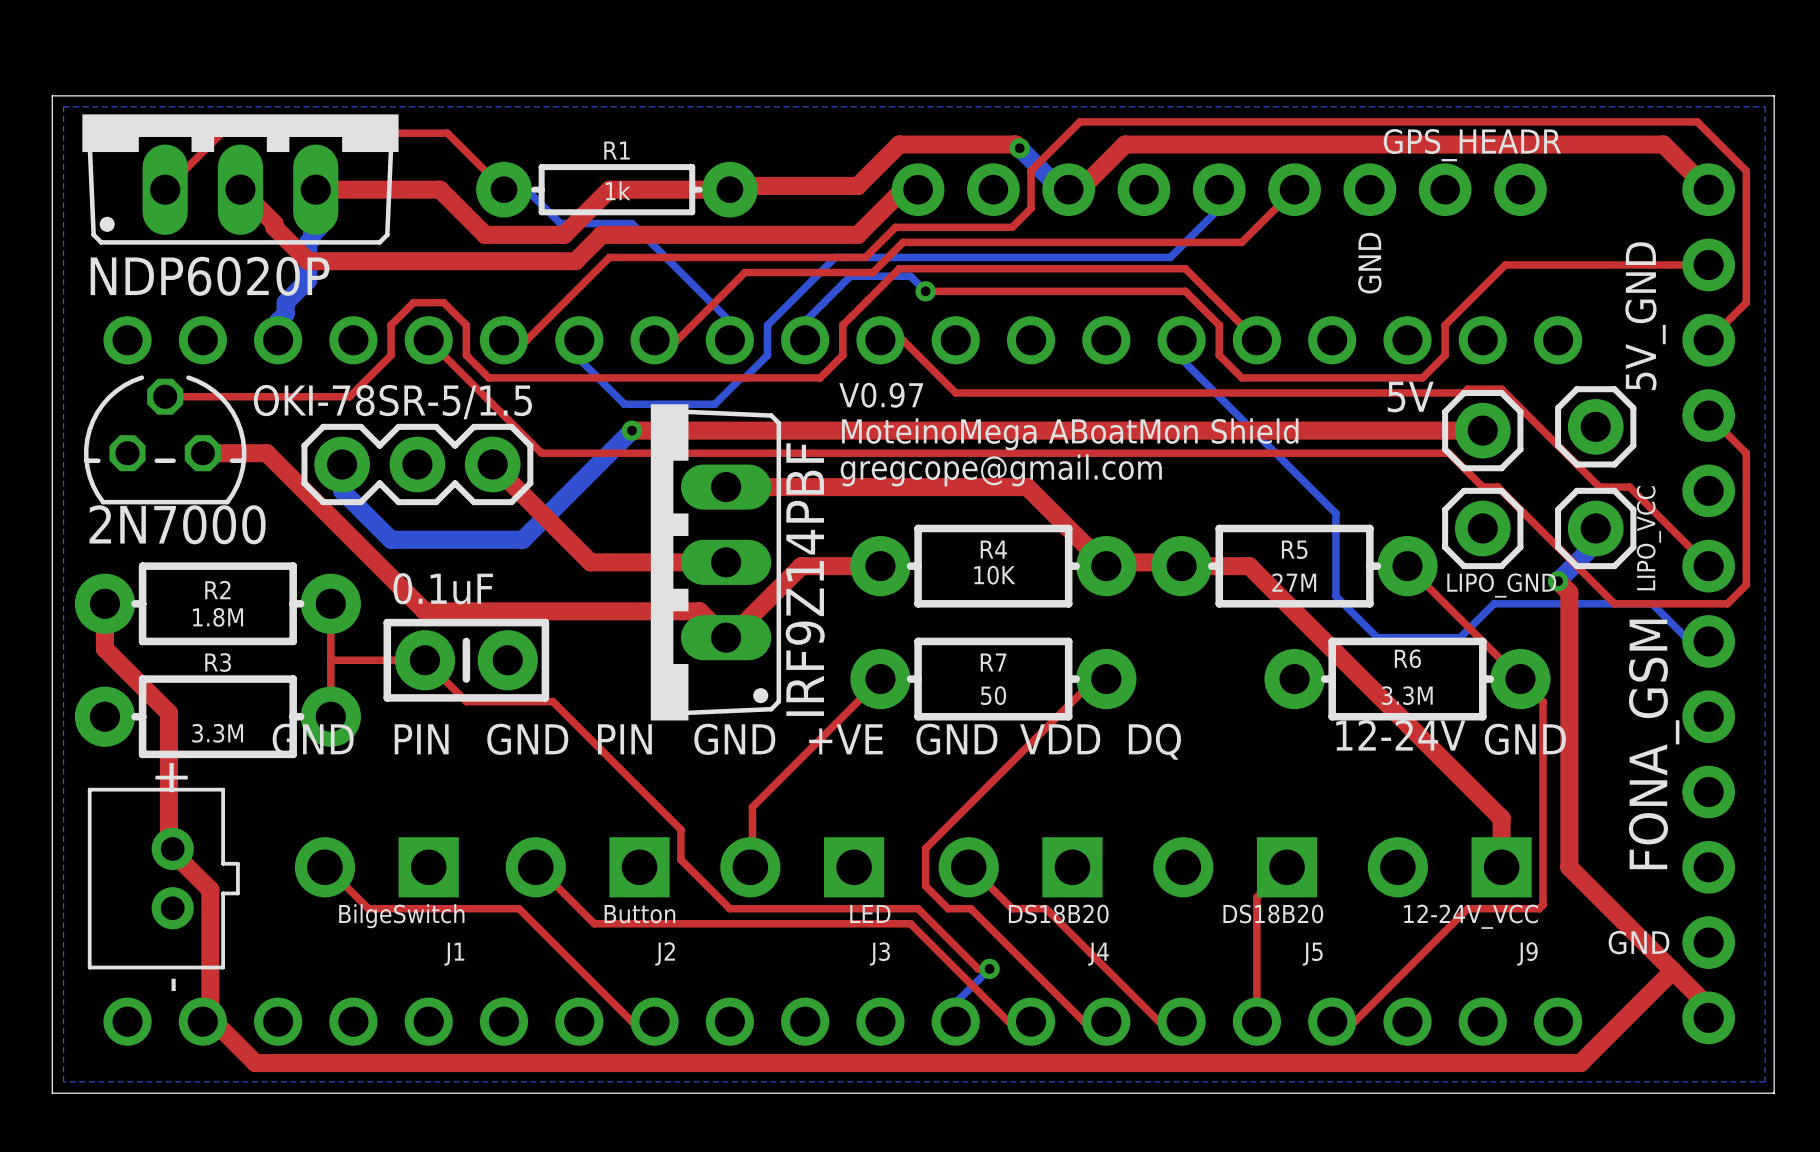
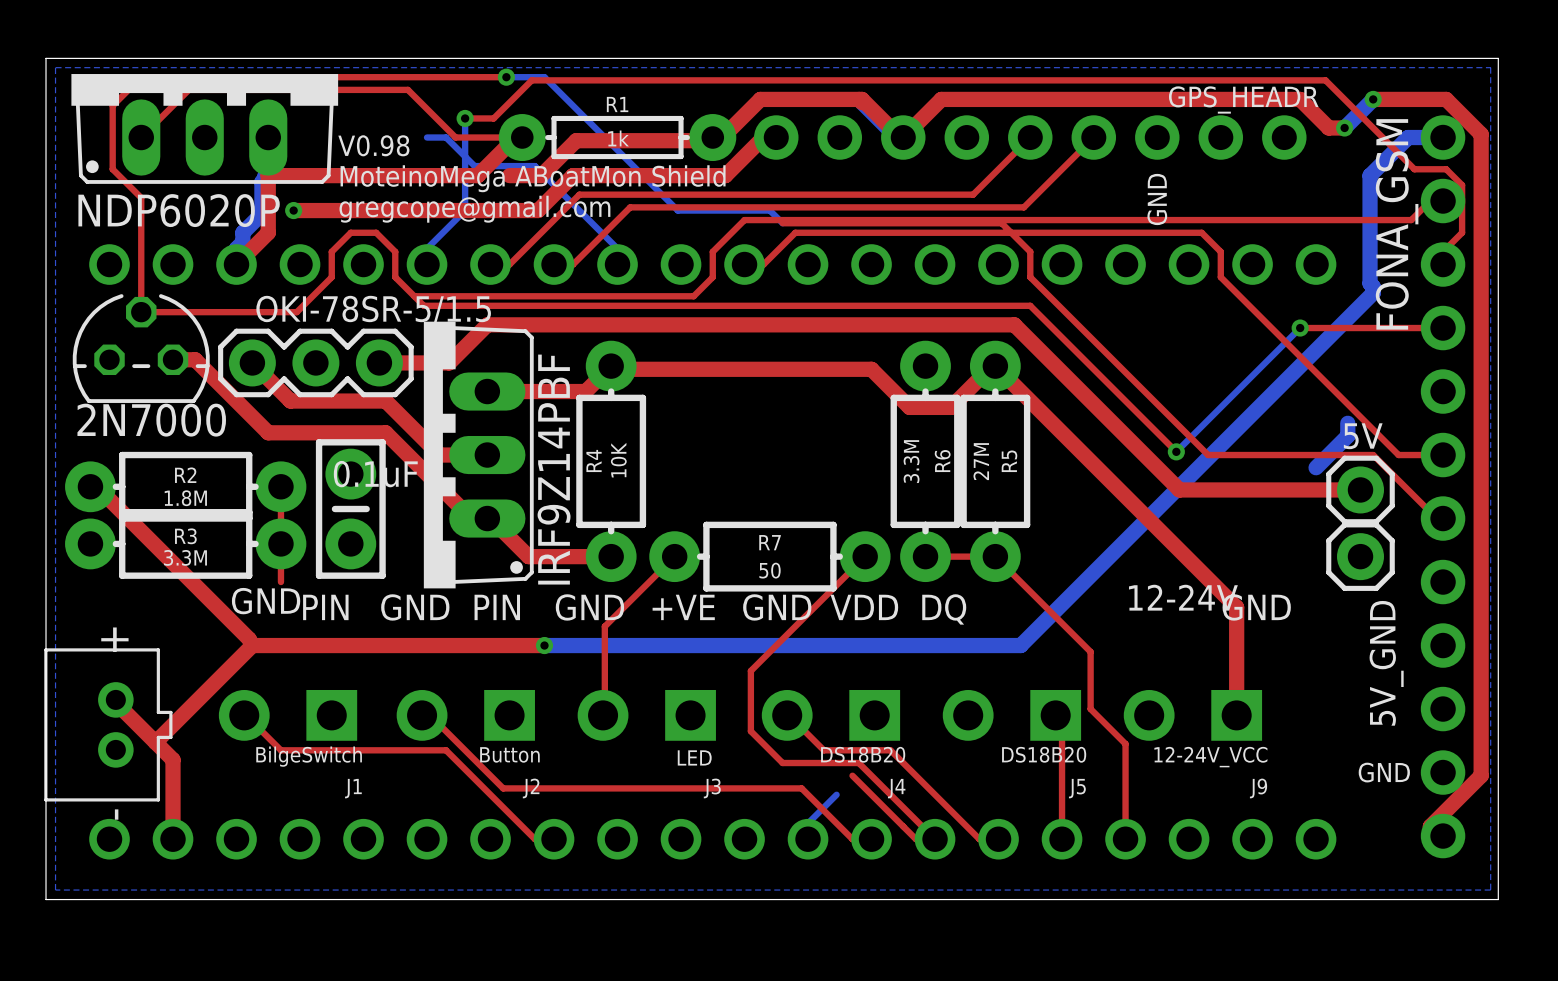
top track: none -> (506, 77) (141, 77) (112, 105) (112, 169) (141, 197) (141, 312)
via: none -> (506, 77)
top track: (1079, 121) (1031, 170) (1031, 208) (1012, 227) (895, 227) (865, 257) -> (1030, 137) (973, 194) (731, 194)
top track: none -> (912, 80) (531, 80) (493, 118) (465, 118)
top track: (1569, 121) (1697, 121) (1746, 170) (1746, 302) (1708, 340) -> (1325, 80) (1414, 169) (1446, 169) (1462, 185) (1462, 232) (1430, 264)
top track: (447, 133) (503, 189) -> (379, 89) (407, 89) (455, 137) (515, 137)
top track: (1125, 144) (1079, 189) (1068, 189) -> (950, 99) (941, 99) (903, 137) (896, 134) (862, 99) (858, 99)
top track: (1539, 144) (1625, 144) -> (1300, 99) (1328, 127) (1344, 127)
bottom track: none -> (1373, 99) (1344, 127)
via: none -> (1373, 99)
top track: (1663, 144) (1708, 189) -> (1404, 99) (1446, 99) (1481, 134) (1481, 775) (1430, 826) (1430, 836)
via: (1019, 148) -> none
bottom track: none -> (465, 118) (465, 210) (427, 248) (427, 264)
via: none -> (465, 118)
via: none -> (1344, 127)
top track: (857, 185) (737, 185) (729, 189) (616, 189) -> (725, 134) (722, 137) (712, 137) (706, 140) (576, 140) (541, 175)
top track: (240, 189) (308, 261) (575, 261) (601, 234) -> none
top track: (315, 189) (439, 189) (485, 234) -> (268, 175) (411, 175)
top track: none -> (268, 137) (268, 232) (236, 264)
R1 position: (616, 189) -> (617, 137)
bottom track: (1219, 189) (1219, 208) (1170, 257) (835, 257) (767, 325) (767, 355) (714, 404) (624, 404) (579, 359) (579, 340) -> none
bottom track: none -> (1430, 137) (1408, 137) (1370, 175) (1370, 283) (1373, 286) (1373, 293) (1020, 645) (544, 645)
text: none -> V0.98 (373, 145)
top track: (639, 234) (677, 234) -> (293, 210) (538, 210) (573, 175)
top track: (1241, 242) (903, 242) (872, 272) -> (1049, 181) (1023, 207) (738, 207)
top track: (684, 257) (609, 257) (526, 340) (503, 340) -> (579, 194) (509, 264) (490, 264)
top track: (1708, 264) (1505, 264) (1445, 325) -> none
via: none -> (293, 210)
bottom track: (850, 276) (805, 321) (805, 340) -> (719, 210) (677, 210) (544, 77) (506, 77)
top track: (880, 287) (899, 268) (1185, 268) (1256, 340) -> (744, 220) (1411, 220) (1430, 201)
via: (925, 291) -> none
part value position: 5V_GND (1645, 316) -> 5V_GND (1386, 663)
top track: (428, 340) (541, 453) (1448, 453) (1482, 487) (1497, 487) (1614, 603) (1727, 603) (1746, 584) (1746, 453) (1708, 415) -> none
top track: (903, 340) (955, 392) (1463, 392) (1467, 389) (1501, 389) (1599, 487) (1629, 487) (1708, 566) -> (763, 264) (795, 232) (1201, 232) (1220, 251)
bottom track: (1181, 340) (1181, 359) (1335, 513) (1335, 596) (1377, 637) (1460, 637) (1494, 603) (1652, 603) (1689, 641) (1708, 641) -> none
top track: (1445, 355) (1422, 377) (1241, 377) -> (1430, 518) (1430, 512) (1373, 455) (1208, 455) (1049, 296)
top track: none -> (1220, 277) (1398, 455) (1430, 455)
top track: none -> (414, 296) (423, 305) (1030, 305) (1176, 451)
text: V0.97 (881, 395) -> none
part value position: 5V (1410, 397) -> 5V (1363, 436)
part value position: OKI-78SR-5/1.5 (392, 402) -> OKI-78SR-5/1.5 (373, 310)
top track: none -> (1300, 328) (1430, 328)
bottom track: none -> (1300, 328) (1176, 451)
via: none -> (1300, 328)
part position: (1595, 426) -> (1360, 556)
top track: (631, 430) (1482, 430) -> none
bottom track: (631, 430) (522, 539) (391, 539) (342, 490) (342, 464) -> none
via: (631, 430) -> none
part position: (1482, 430) -> (1360, 489)
text position: MoteinoMega ABoatMon Shield (1070, 434) -> MoteinoMega ABoatMon Shield (533, 178)
top track: (229, 453) (266, 453) (424, 611) (699, 611) (726, 637) (733, 633) (801, 566) (880, 566) -> (195, 359) (268, 432) (385, 432) (471, 518) (487, 518) (493, 521) (528, 556) (611, 556)
top track: none -> (252, 362) (290, 401) (385, 401) (439, 455) (487, 455)
top track: none -> (379, 362) (449, 362) (487, 324) (1014, 324) (1179, 489) (1360, 489)
part position: (417, 464) -> (315, 362)
top track: (492, 464) (590, 562) (726, 562) -> none
text position: gregcope@gmail.com (1001, 470) -> gregcope@gmail.com (474, 209)
top track: (726, 487) (1027, 487) (1106, 566) (1113, 562) (1174, 562) (1181, 566) (1249, 566) (1501, 818) (1501, 867) -> none
top track: none -> (487, 391) (585, 391) (611, 366) (617, 369) (871, 369) (909, 407) (950, 407) (989, 369) (995, 366) (1236, 607) (1236, 715)
part: LIPO_GND (1482, 528) -> none
part: LIPO_VCC (1595, 528) -> none
part position: (715, 562) -> (478, 455)
via: none -> (1176, 451)
R4 rotation: 0° (993, 566) -> 90° clockwise (611, 461)
R4 position: (993, 566) -> (611, 461)
R5 rotation: 0° (1294, 566) -> 90° clockwise (995, 461)
top track: (1407, 566) (1543, 701) (1543, 904) (1539, 908) (1467, 908) (1354, 1021) (1332, 1021) -> (925, 556) (995, 556) (1090, 651) (1090, 709) (1125, 743) (1125, 839)
top track: (1558, 581) (1569, 592) (1569, 867) (1708, 1006) (1708, 1017) -> none
via: (1558, 581) -> none
top track: none -> (90, 474) (90, 480) (249, 639) (252, 645)
top track: (104, 603) (104, 648) (168, 712) (168, 840) (172, 852) (210, 889) (210, 1014) (202, 1021) (214, 1021) (255, 1063) (1580, 1063) (1672, 970) -> none
top track: (330, 660) (424, 660) (466, 701) (552, 701) (680, 829) (680, 859) (729, 908) (918, 908) (978, 968) (989, 968) -> none
part rotation: 0° (466, 660) -> 90° clockwise (350, 509)
top track: (880, 679) (752, 807) (752, 867) (750, 867) -> none
R7 position: (993, 679) -> (769, 556)
top track: (1106, 679) (1095, 679) (925, 848) (925, 886) (948, 908) (970, 908) (1008, 946) -> none
R6 rotation: 0° (1407, 679) -> 90° clockwise (925, 461)
R6 position: (1407, 679) -> (925, 461)
top track: none -> (674, 556) (604, 626) (604, 715) (603, 715)
top track: none -> (865, 556) (750, 670) (750, 731) (782, 763) (858, 763) (935, 839)
R3 position: (217, 716) -> (185, 543)
text position: PIN (421, 739) -> PIN (325, 607)
text position: GND (527, 739) -> GND (415, 607)
text position: PIN (624, 739) -> PIN (497, 607)
text position: GND (734, 739) -> GND (589, 607)
text position: +VE (845, 739) -> +VE (683, 607)
text position: GND (956, 739) -> GND (777, 607)
text position: VDD (1060, 739) -> VDD (864, 607)
text position: GND (1525, 739) -> GND (1256, 607)
text position: DQ (1154, 741) -> DQ (944, 609)
part value position: FONA_GSM (1654, 744) -> FONA_GSM (1397, 224)
top track: none -> (252, 645) (155, 742)
top track: none -> (252, 645) (544, 645)
via: none -> (544, 645)
top track: none -> (115, 699) (115, 702) (173, 759) (173, 839)
top track: (324, 867) (368, 908) (519, 908) (526, 916) -> (244, 715) (280, 750) (446, 750)
J1 position: (376, 867) -> (288, 715)
top track: (535, 867) (594, 923) (910, 923) (948, 961) -> (422, 715) (430, 715) (503, 788) (801, 788)
J2 position: (587, 867) -> (465, 715)
J3 position: (802, 867) -> (646, 715)
top track: (968, 867) (1012, 908) (1046, 908) (1053, 916) -> (787, 715) (823, 750) (890, 750)
J4 position: (1020, 867) -> (830, 715)
J5 position: (1235, 867) -> (1011, 715)
J9 position: (1449, 867) -> (1192, 715)
part position: (163, 878) -> (108, 724)
J3 value position: LED (870, 913) -> LED (694, 757)
via: (989, 968) -> none

